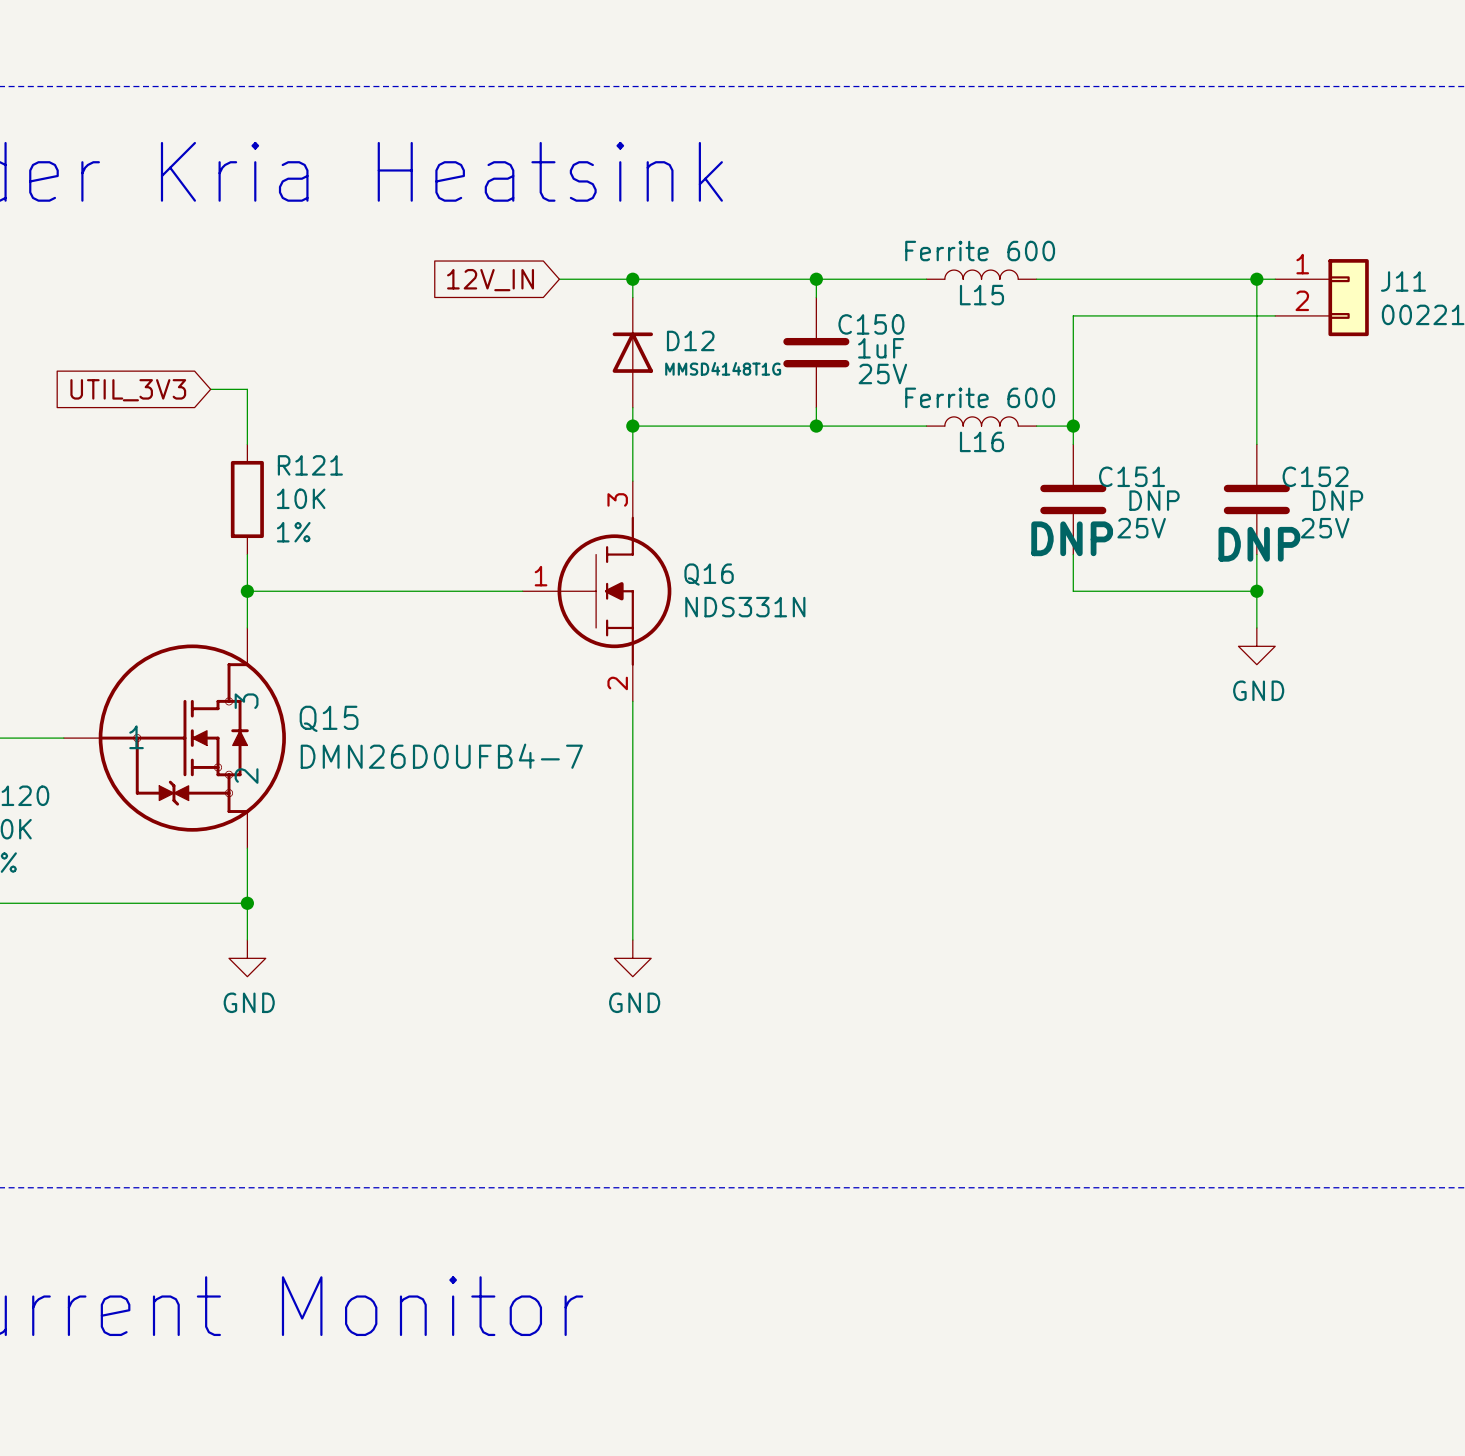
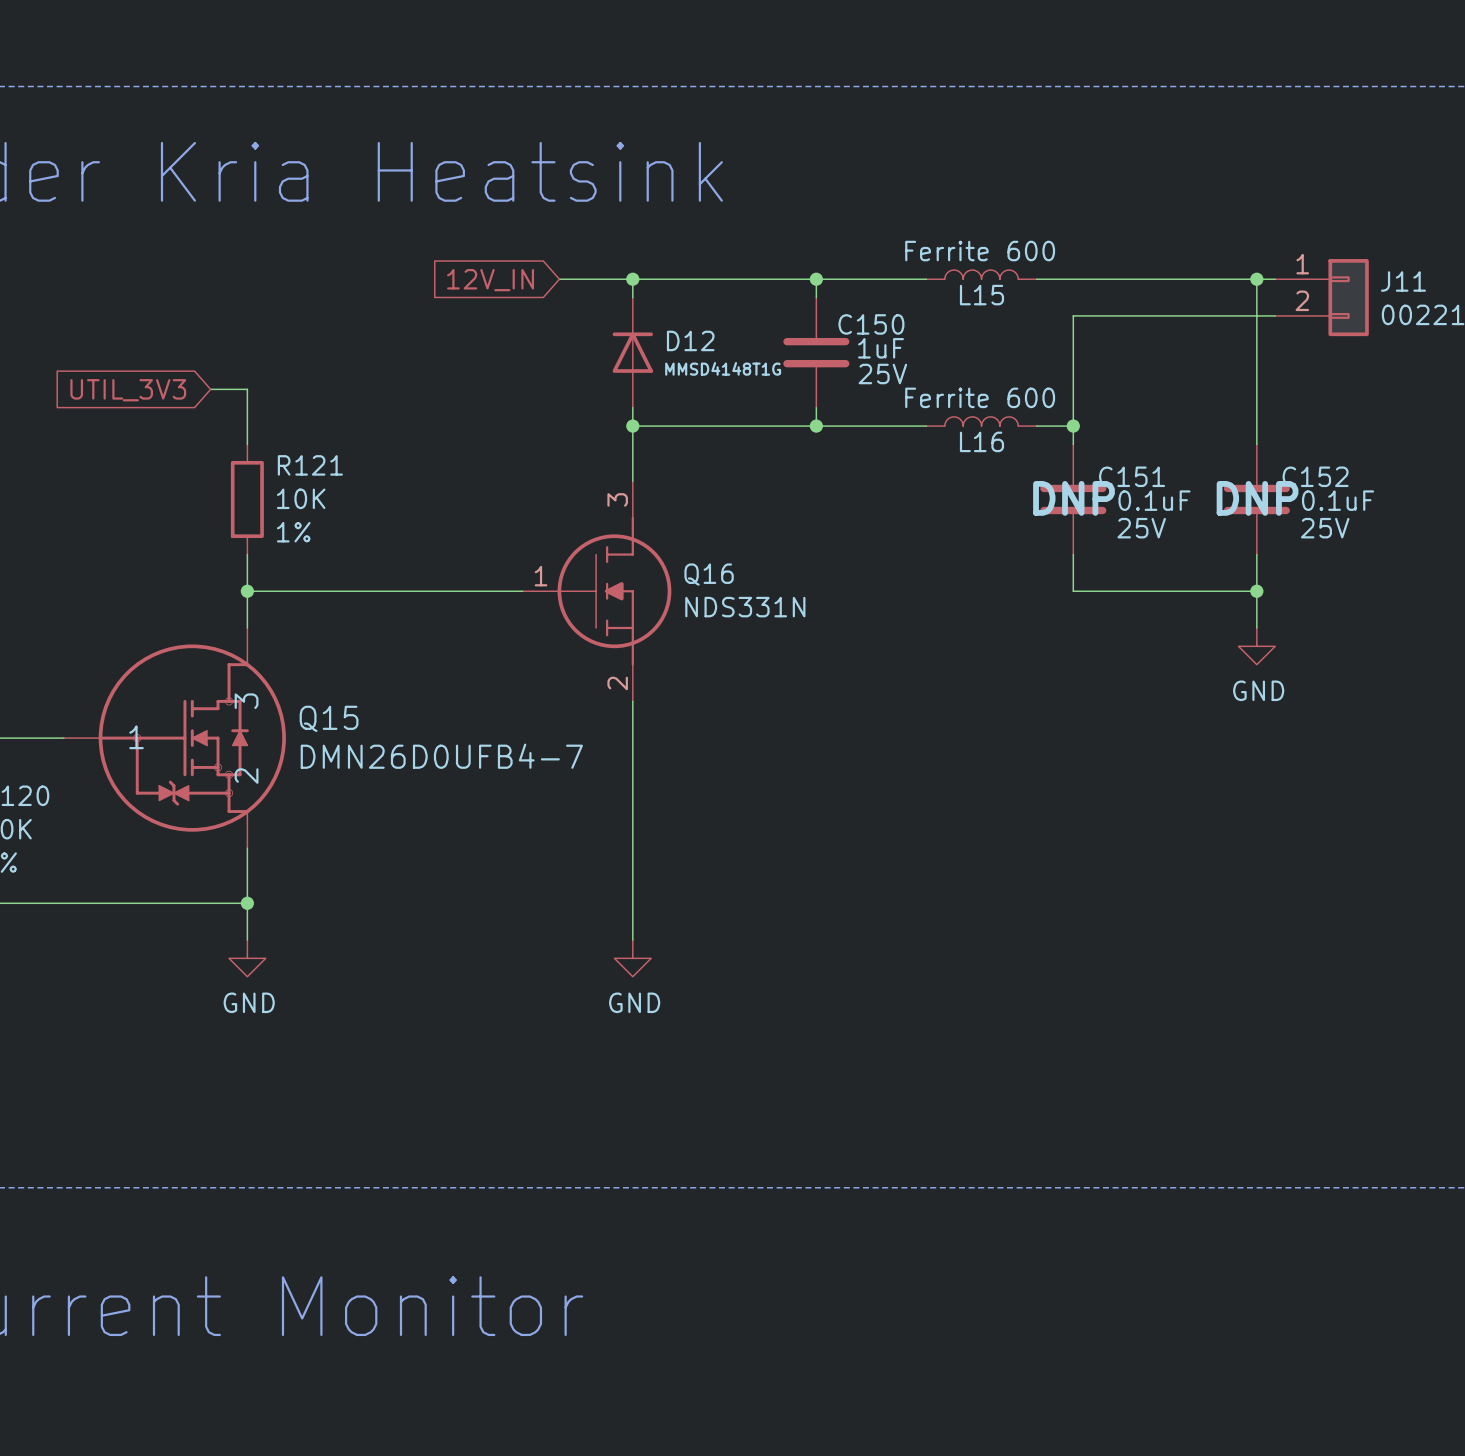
C151 value: DNP (1154, 500) -> 0.1uF (1154, 500)
C152 value: DNP (1338, 500) -> 0.1uF (1338, 500)
C151 text position: DNP (1072, 538) -> DNP (1073, 498)
C152 text position: DNP (1259, 544) -> DNP (1257, 498)

